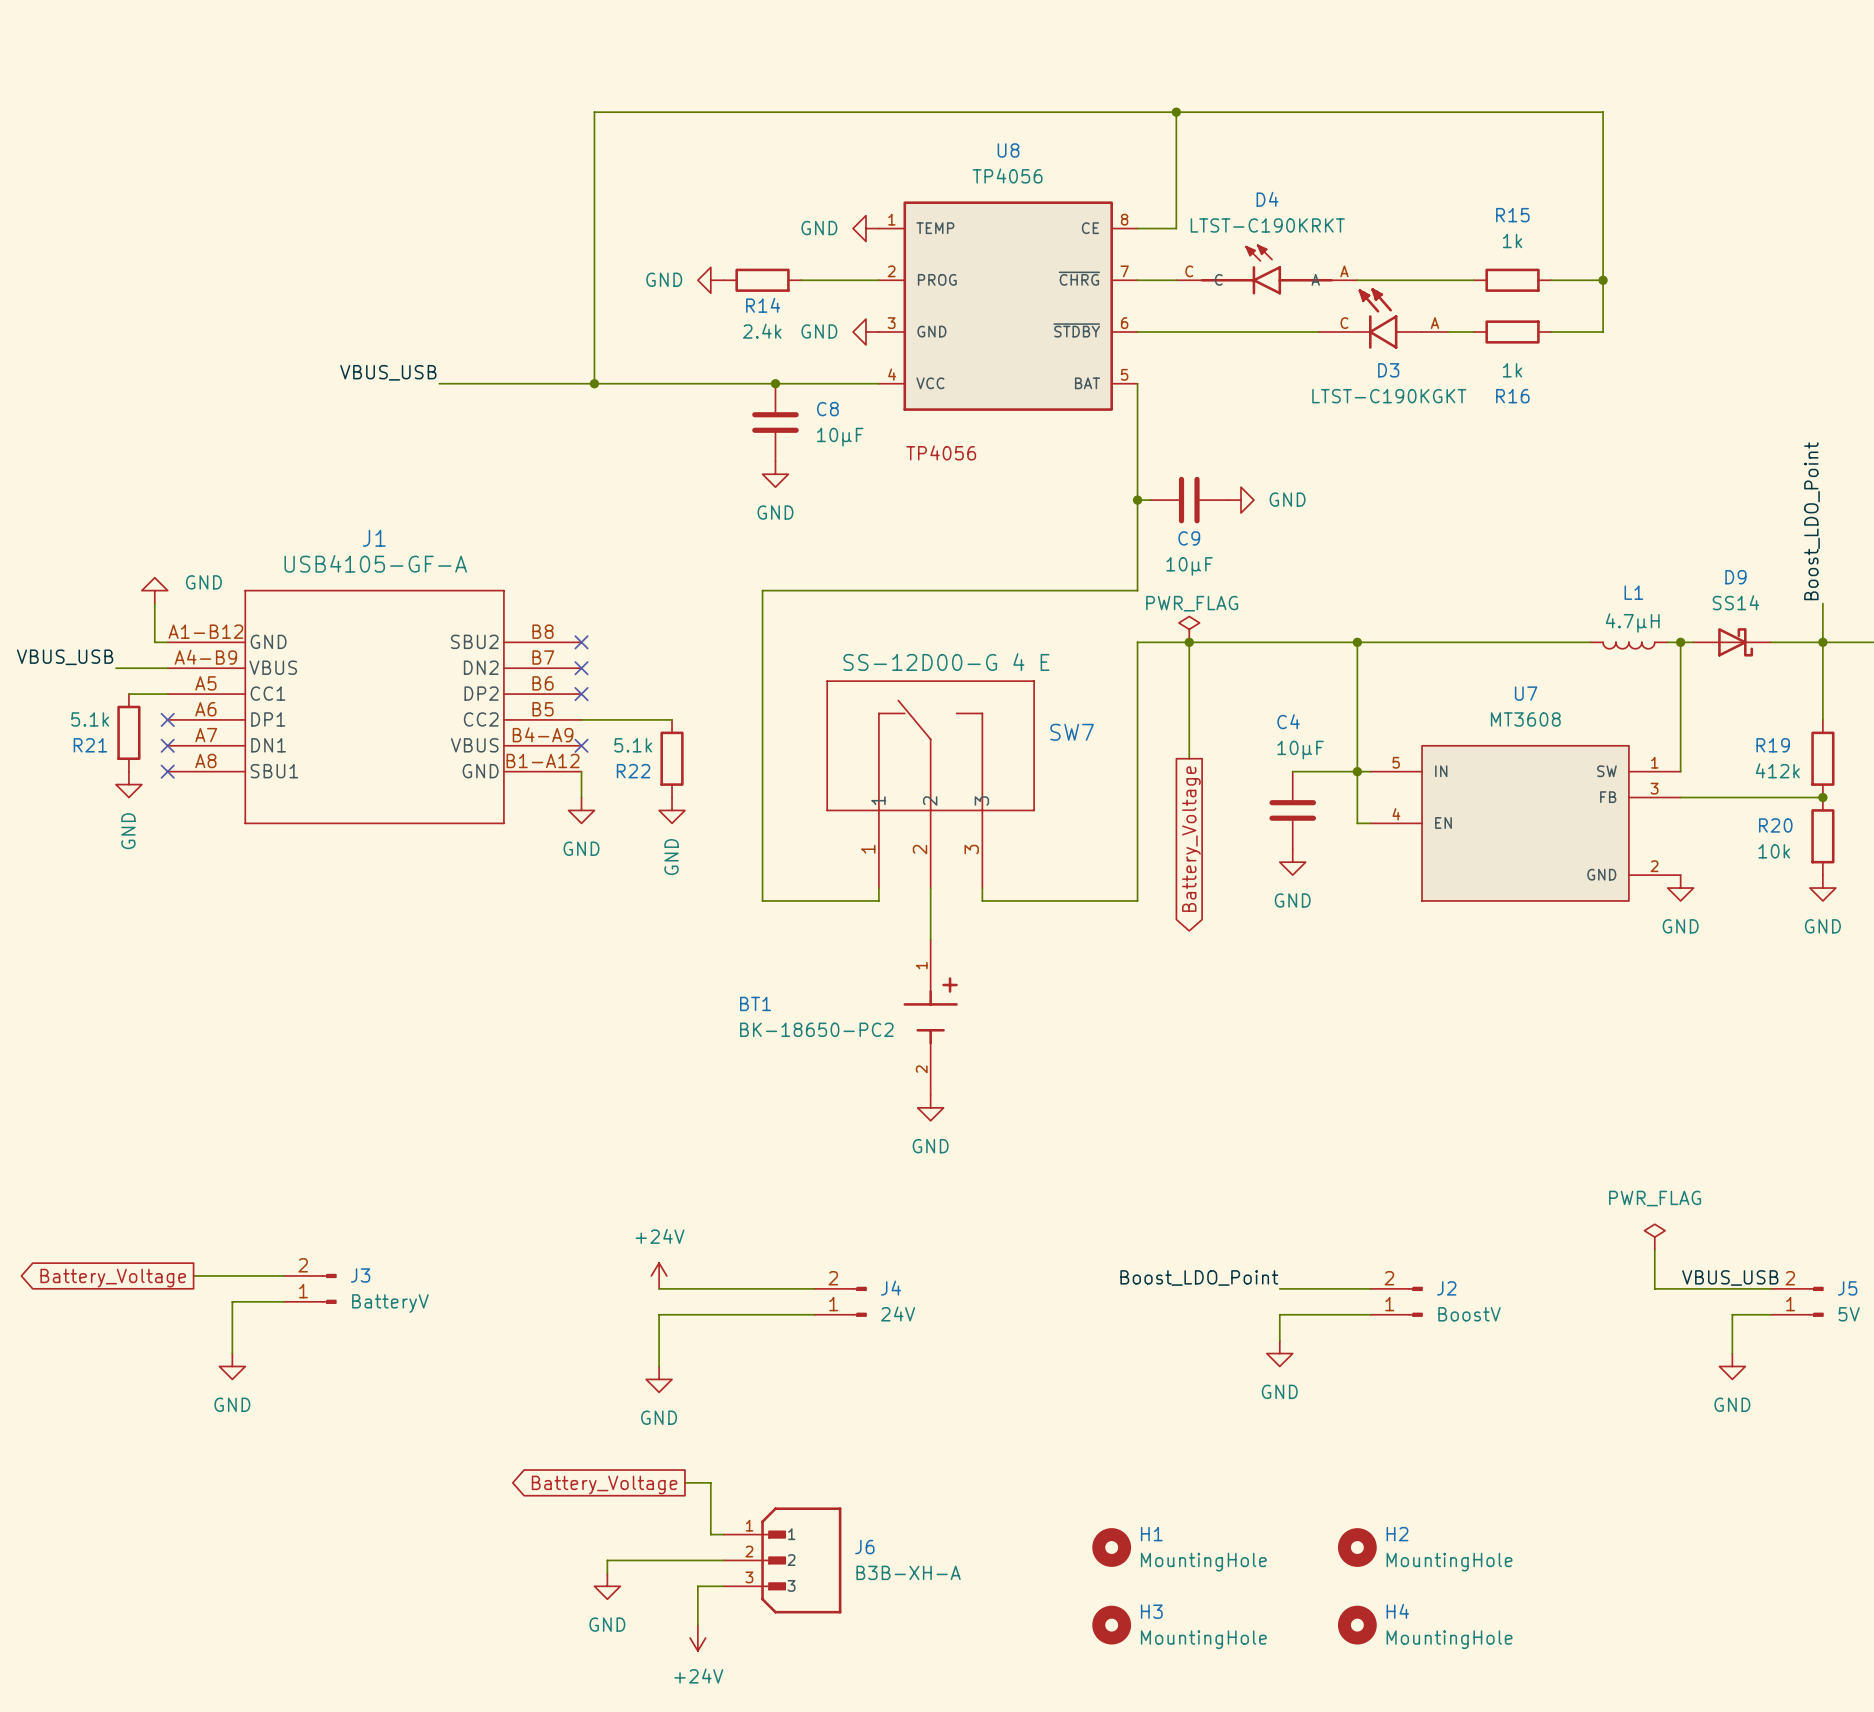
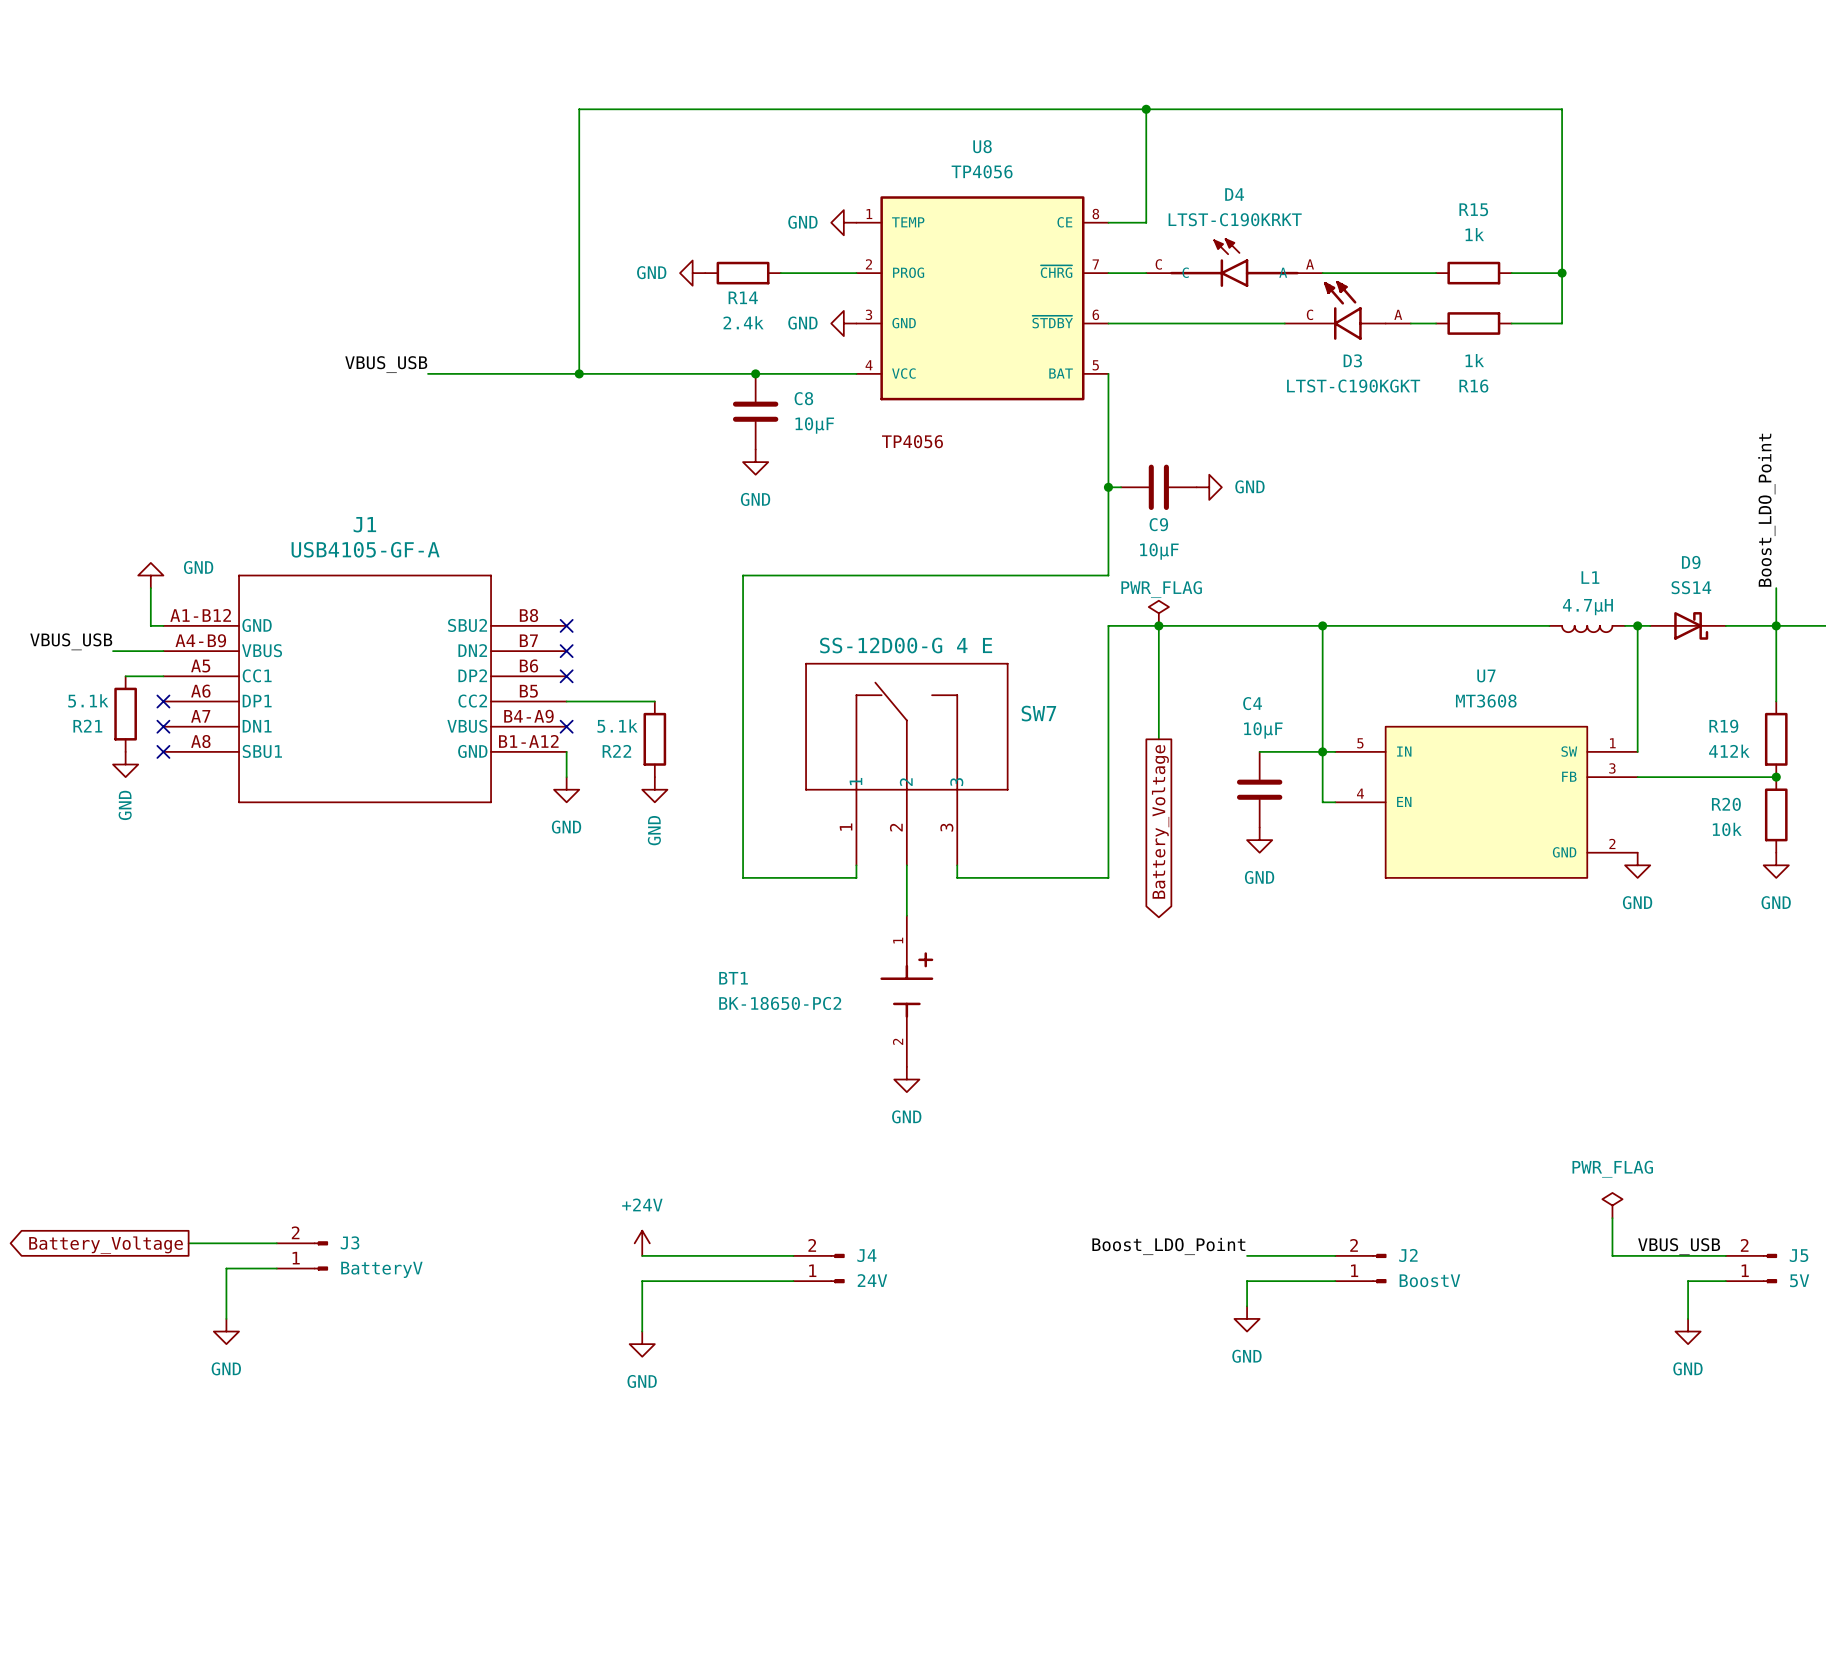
wire: (684, 1482) (710, 1482) (710, 1534) (723, 1534) -> none
global label: Battery_Voltage (604, 1485) -> none
H1: MountingHole (1111, 1547) -> none
H2: MountingHole (1357, 1547) -> none
wire: (723, 1560) (607, 1560) (607, 1573) -> none
J6: B3B-XH-A (782, 1560) -> none
power symbol: GND (607, 1586) -> none
wire: (723, 1586) (697, 1586) (697, 1625) -> none
H3: MountingHole (1111, 1625) -> none
H4: MountingHole (1357, 1625) -> none
power symbol: +24V (697, 1638) -> none

